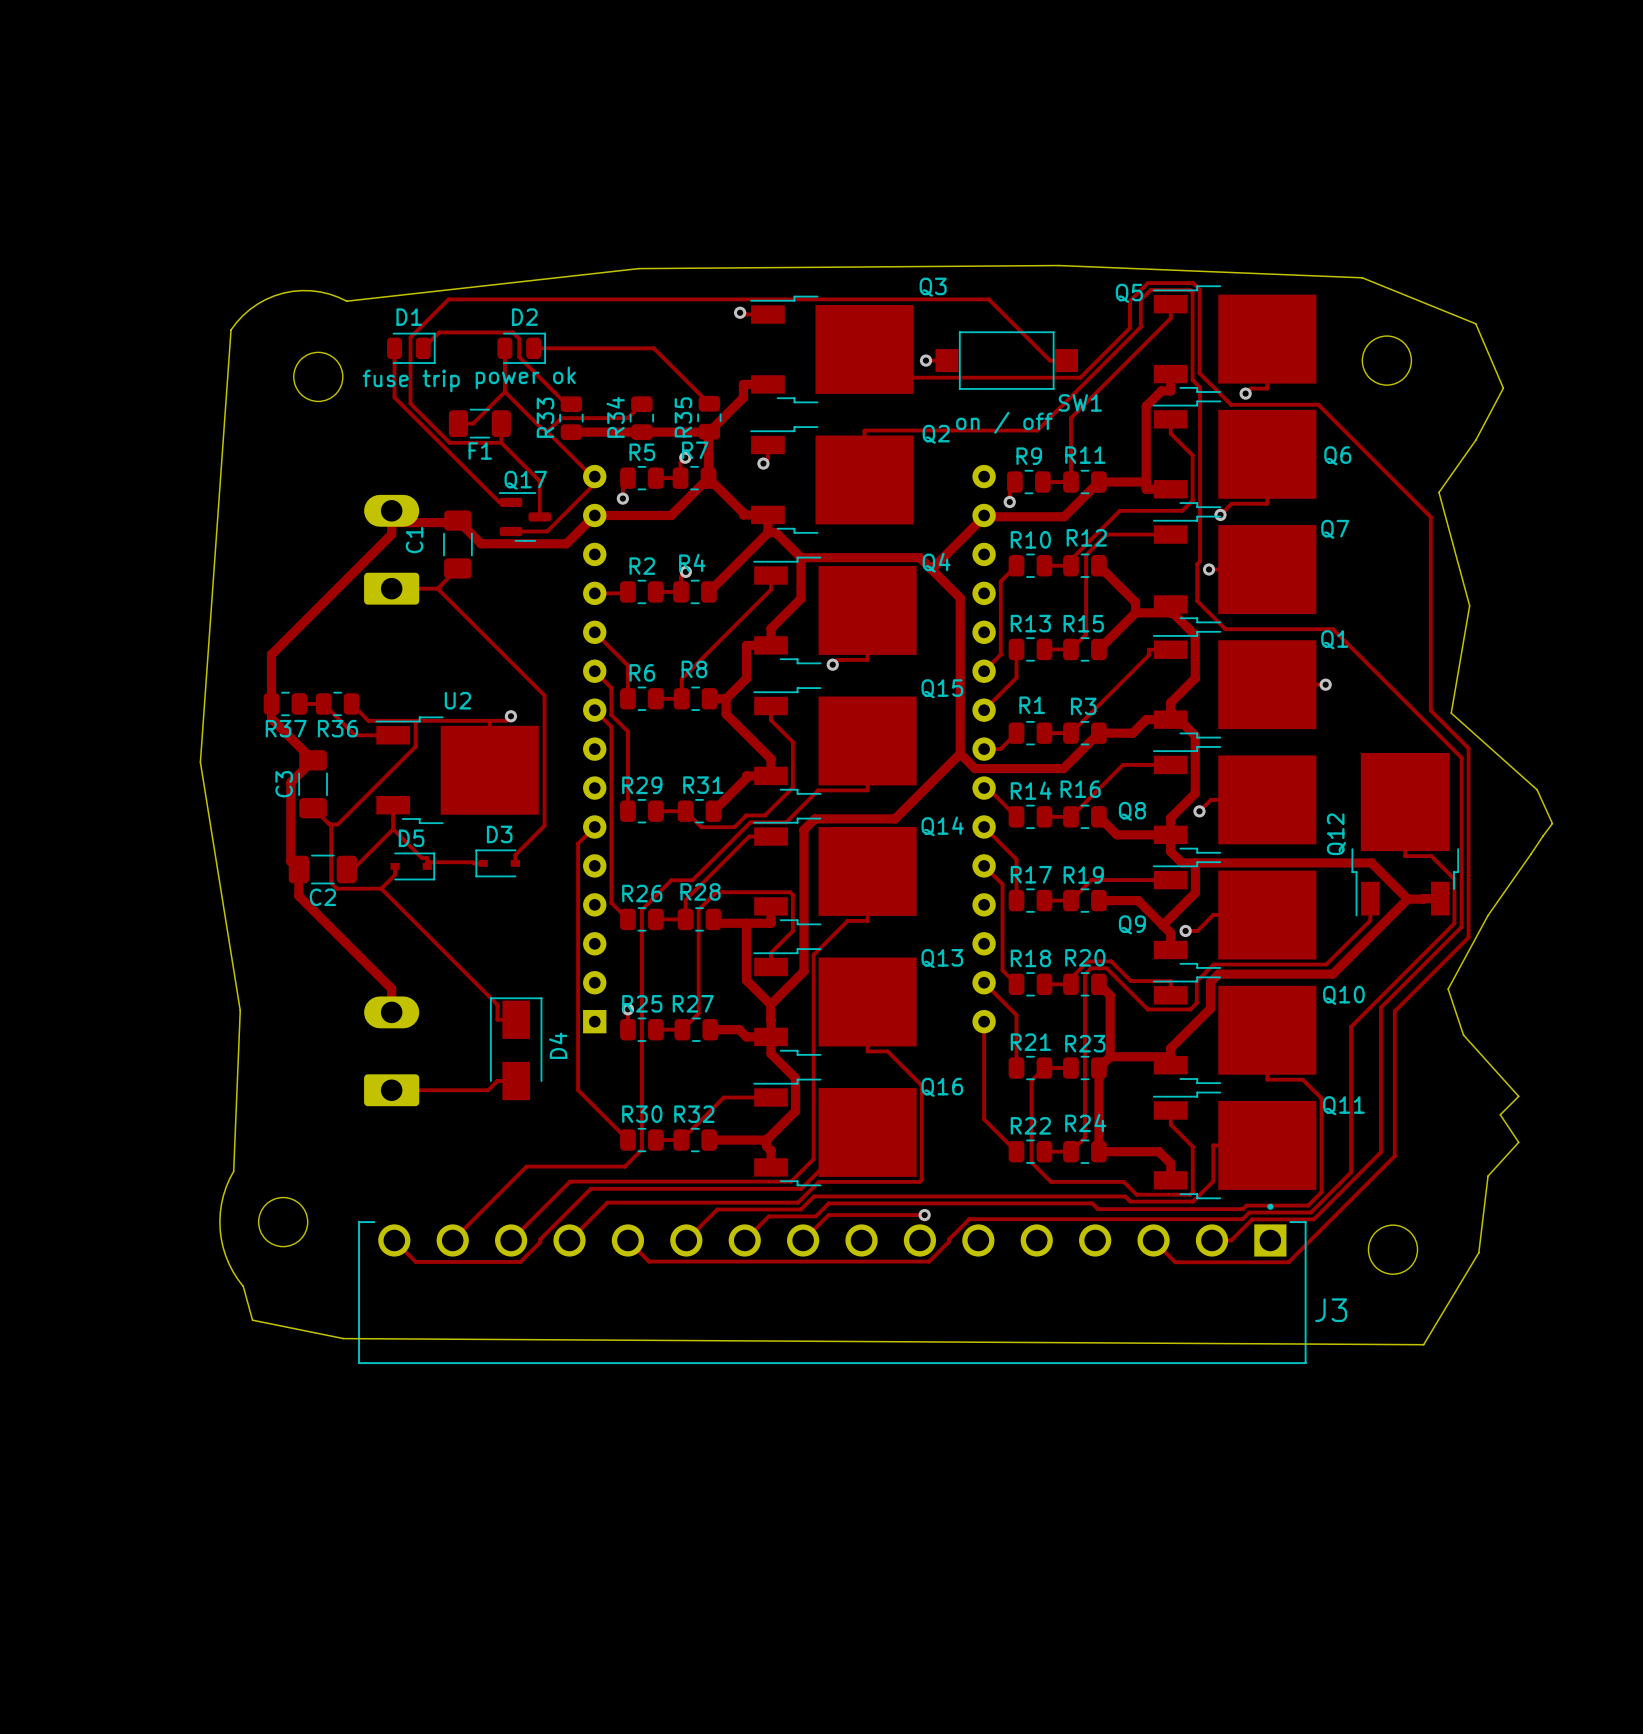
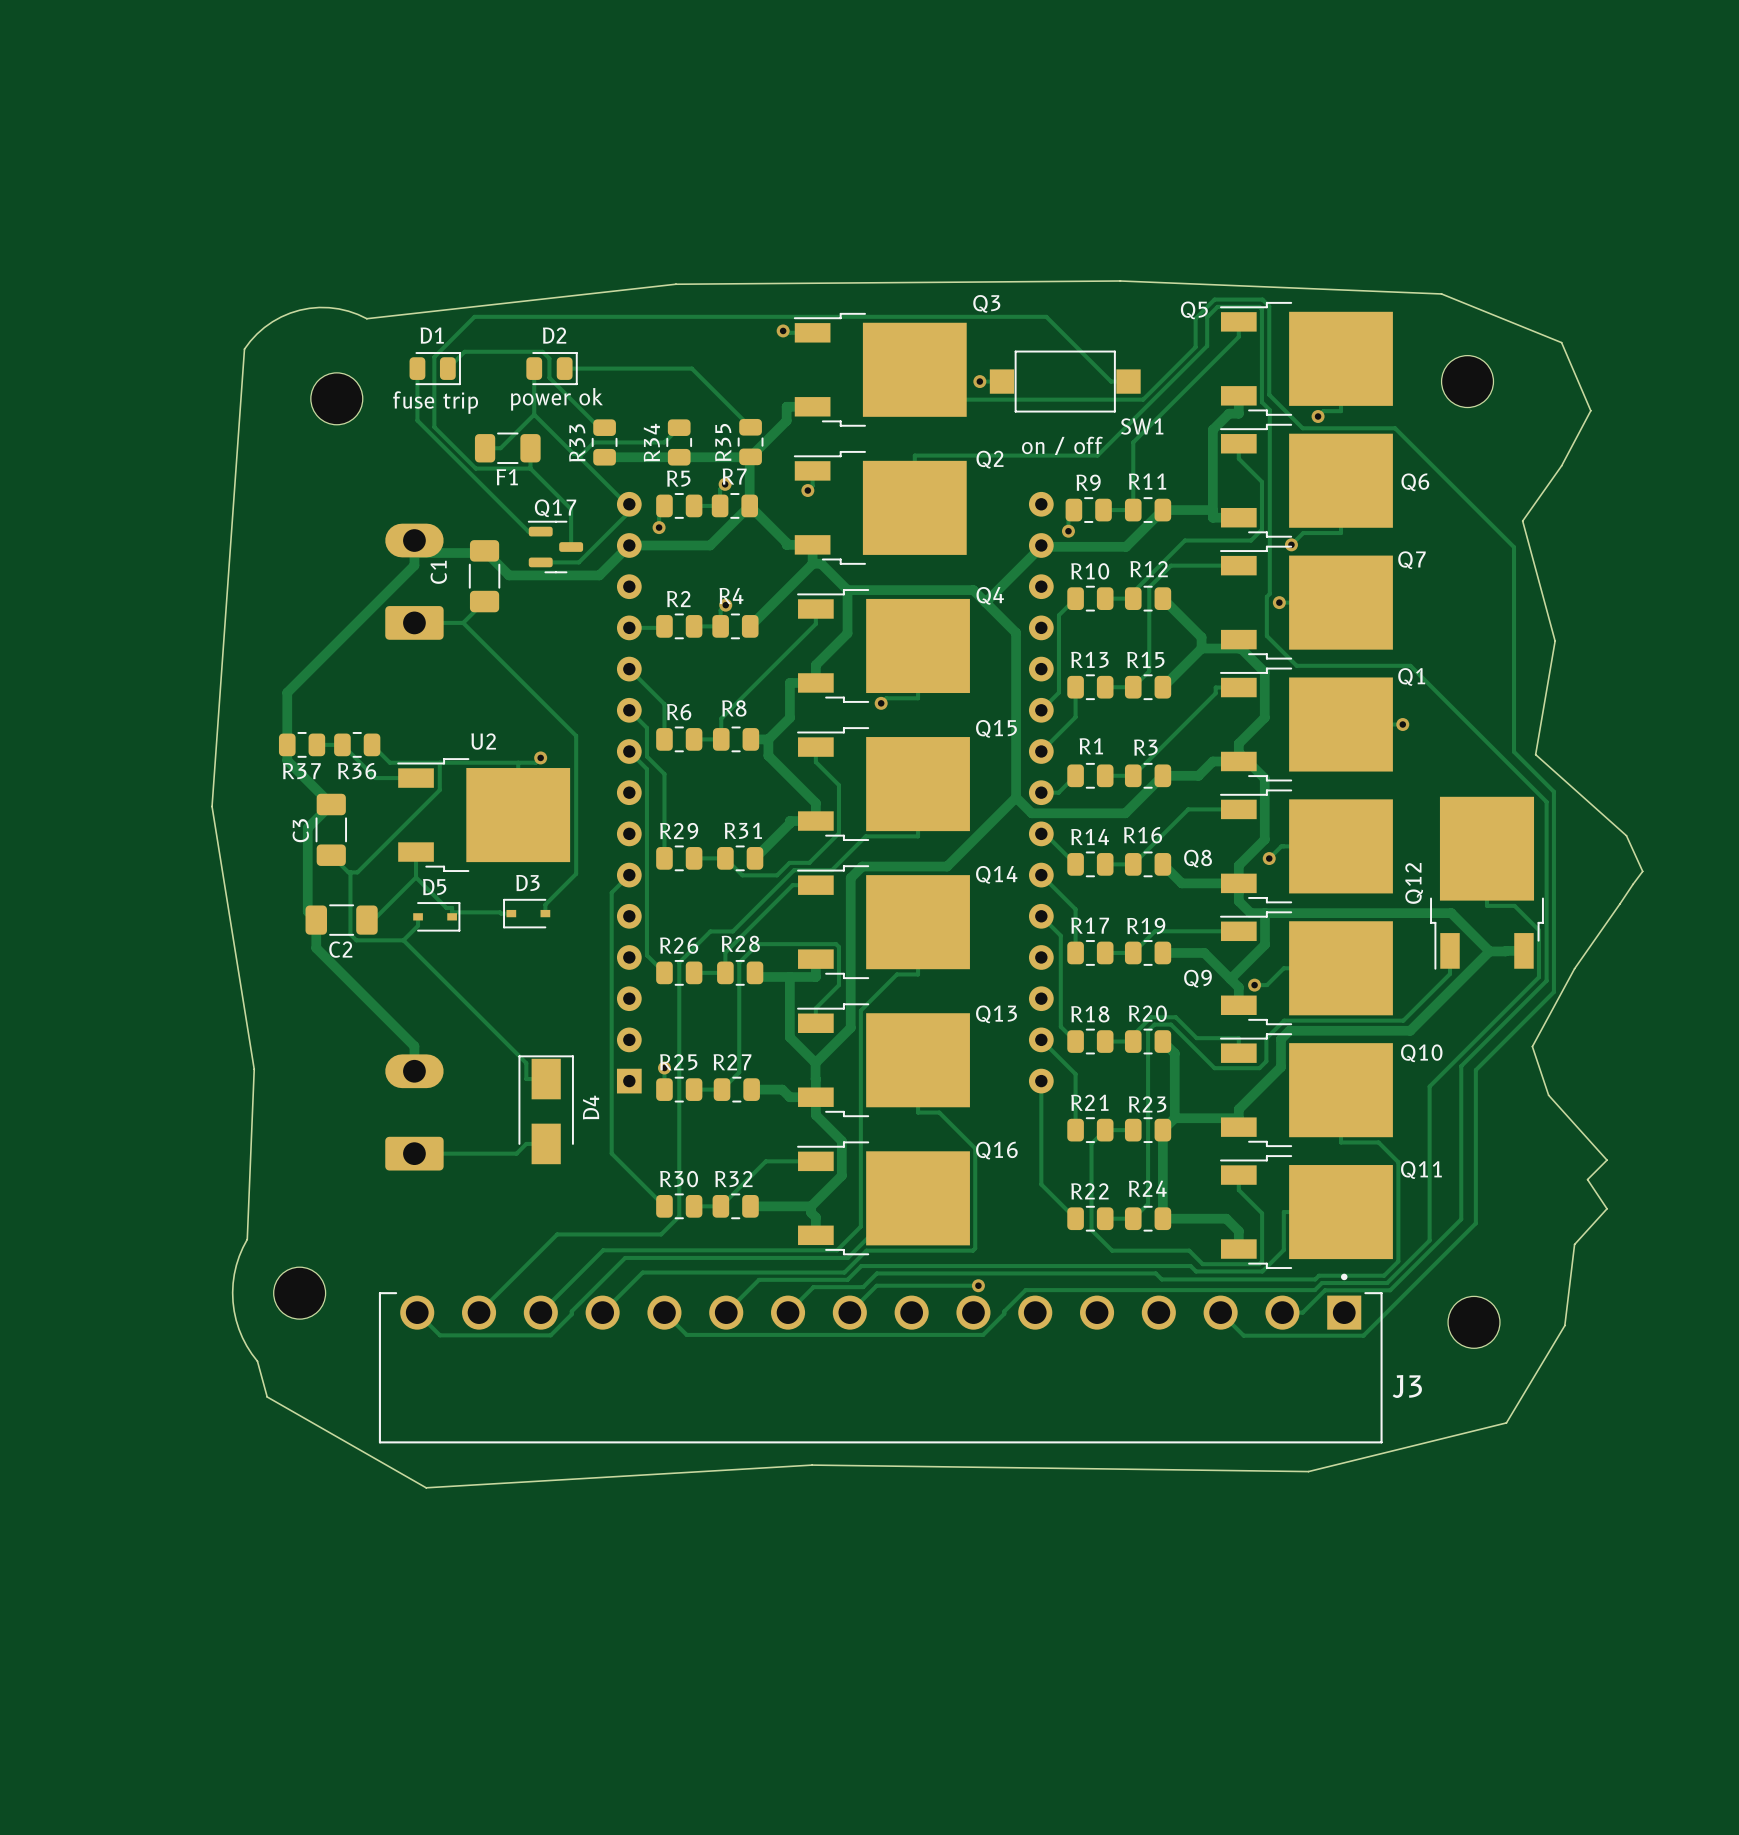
board edge: (252, 1320) (343, 1338) (1423, 1344) -> (267, 1396) (426, 1487) (812, 1465) (1308, 1471) (1506, 1422)

